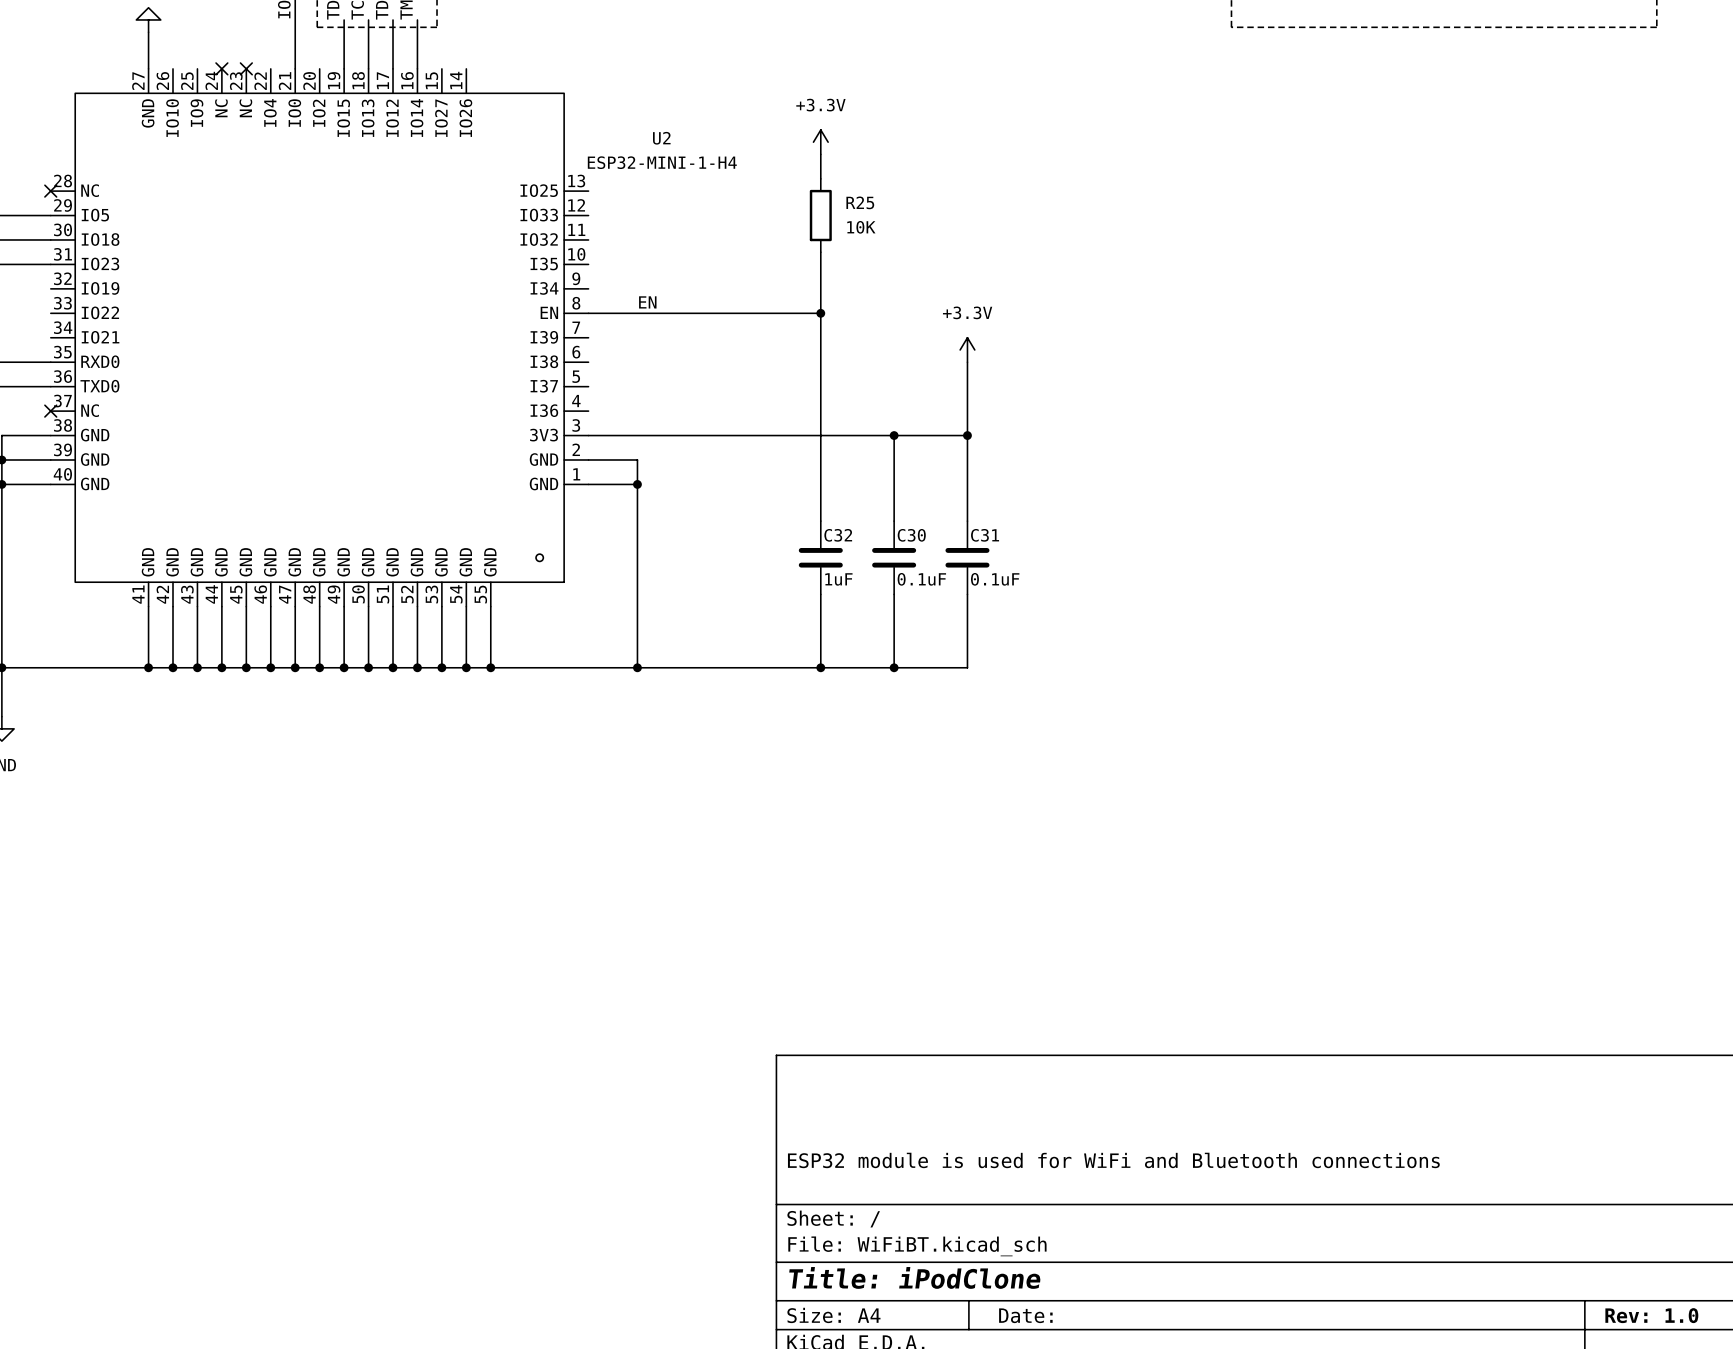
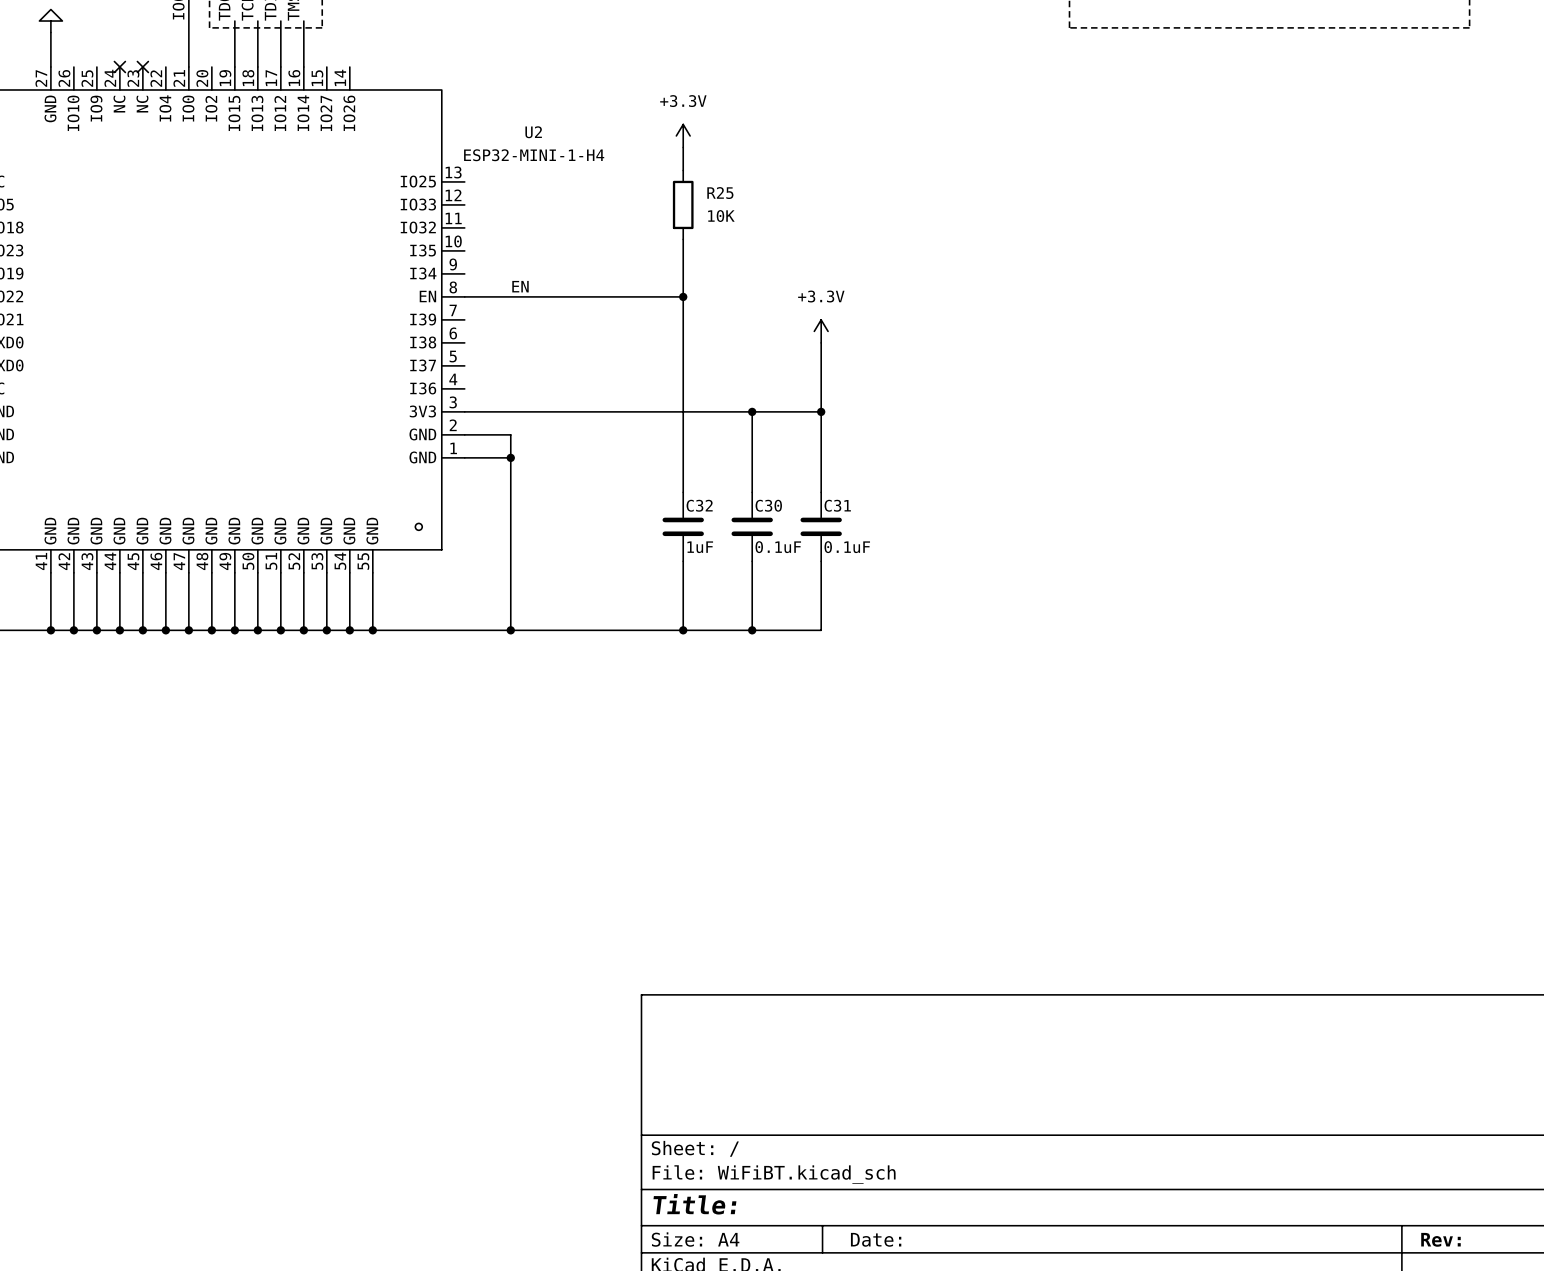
title block: ESP32 module is used for WiFi and Bluetooth connections (1113, 1160) -> none
title block: Title: iPodClone (914, 1277) -> Title: (694, 1204)
title block: Rev: 1.0 (1651, 1315) -> Rev: (1440, 1239)

